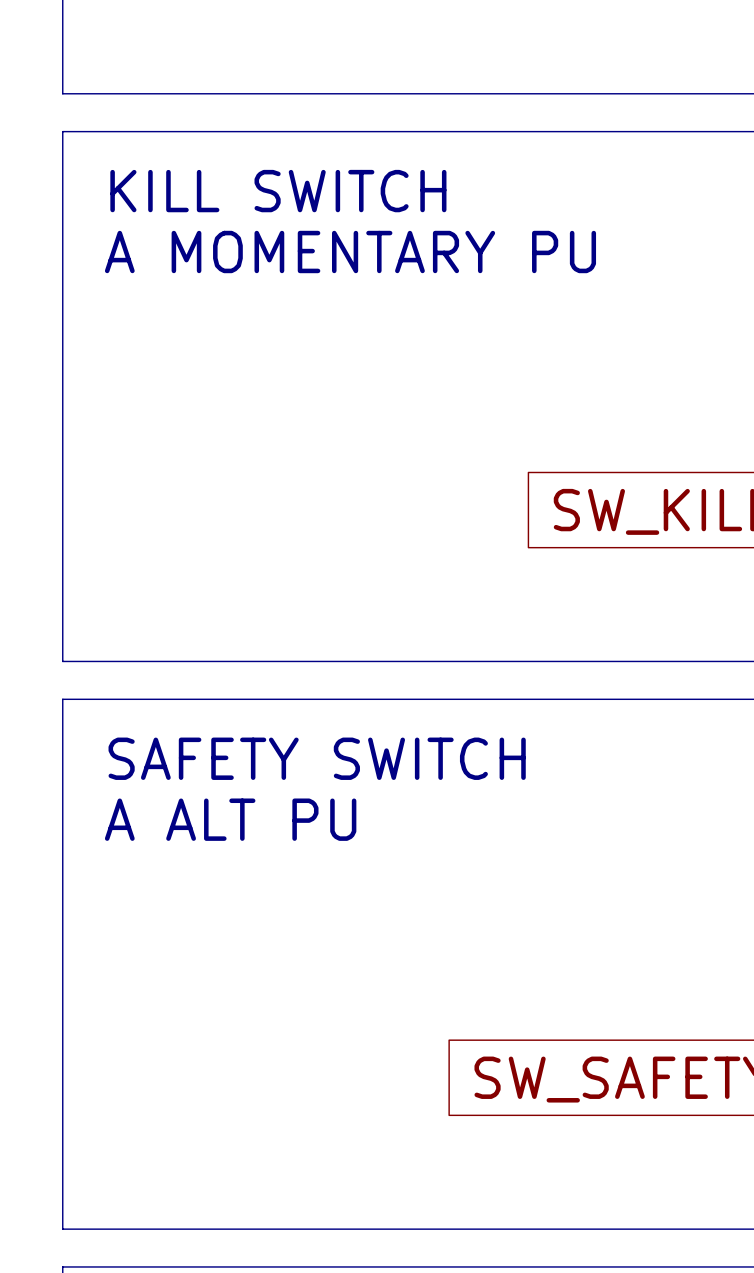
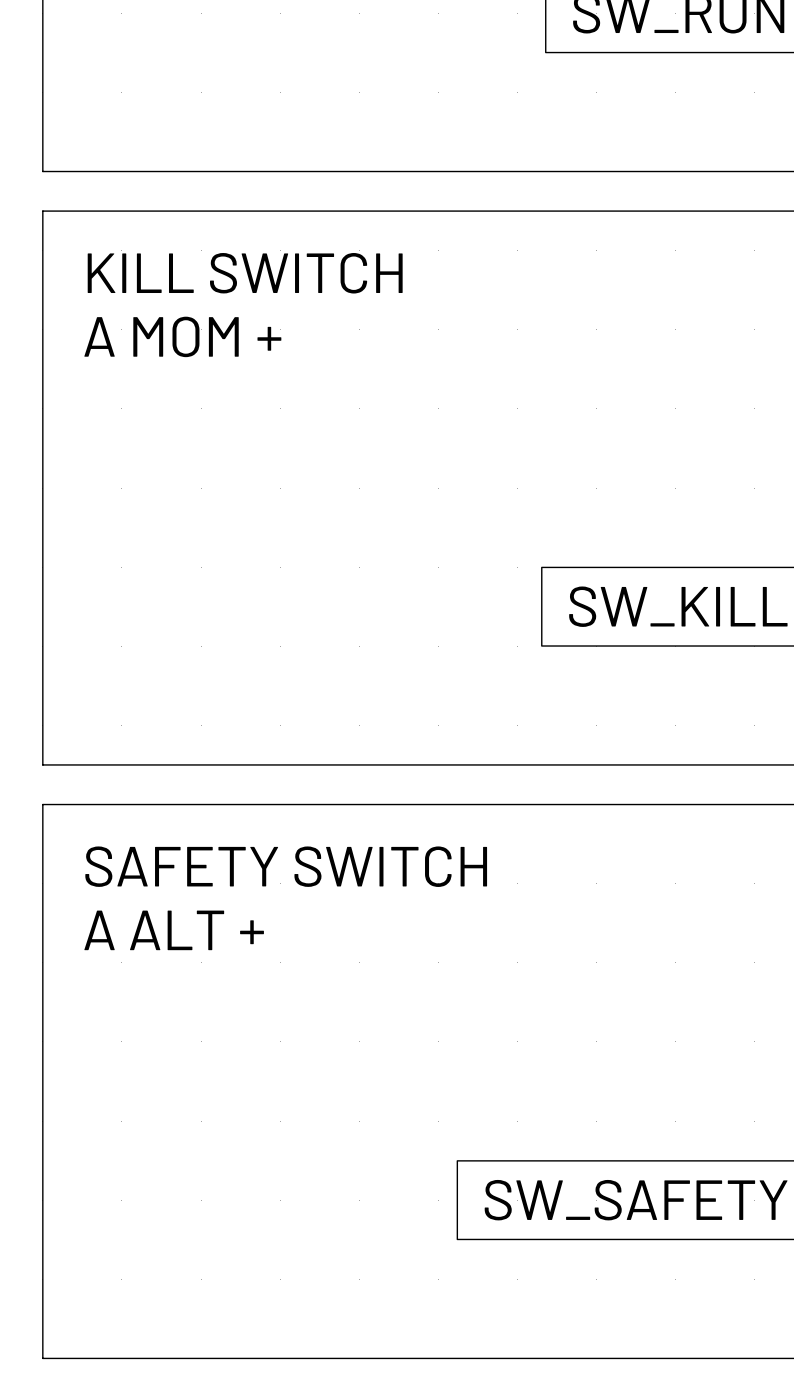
text: A MOMENTARY PU (350, 252) -> A MOM + (182, 336)
text: A ALT PU (230, 819) -> A ALT + (174, 930)

